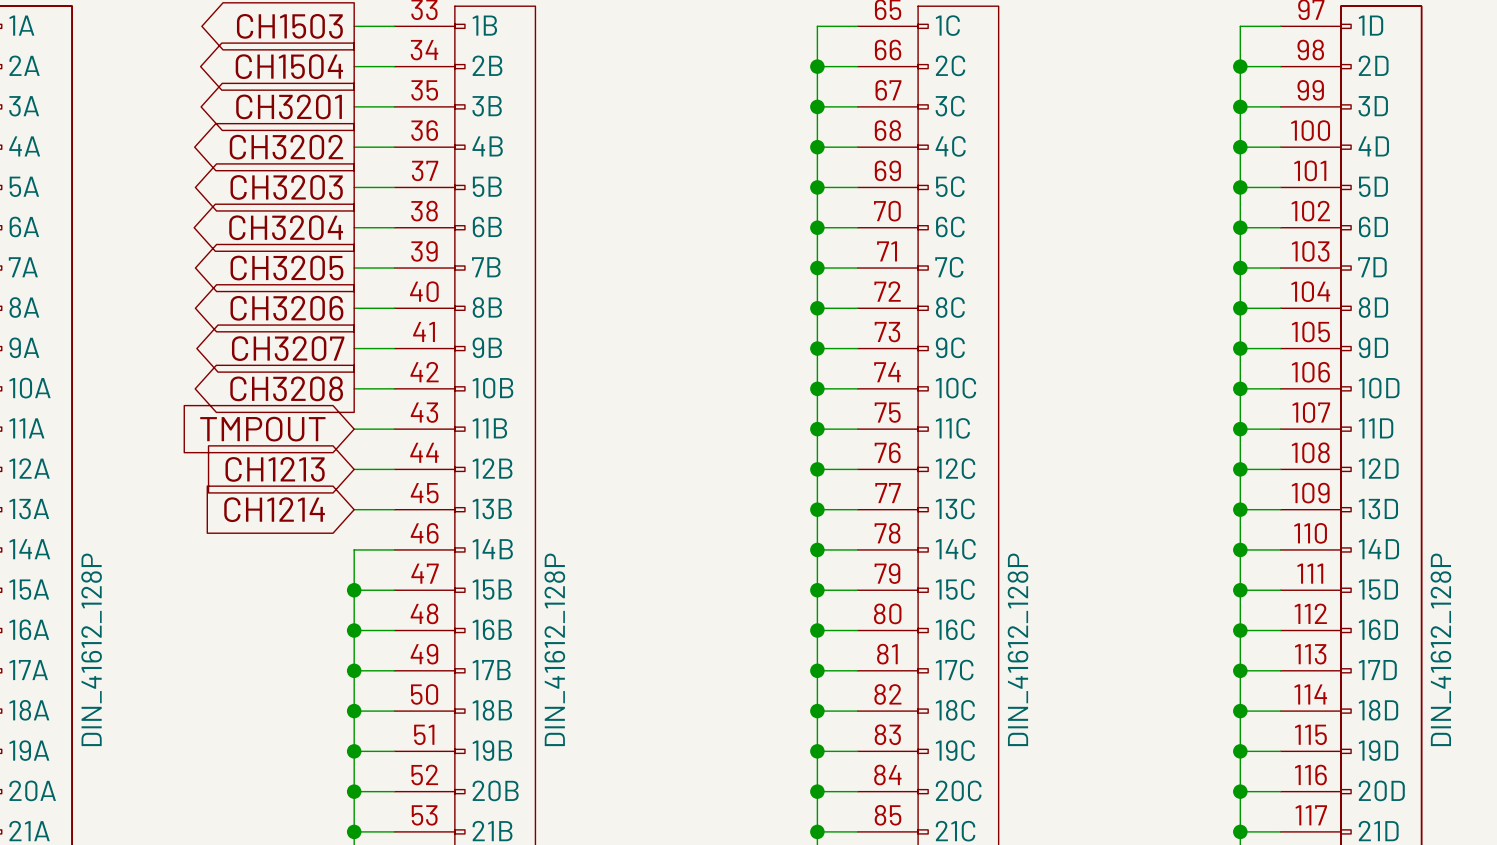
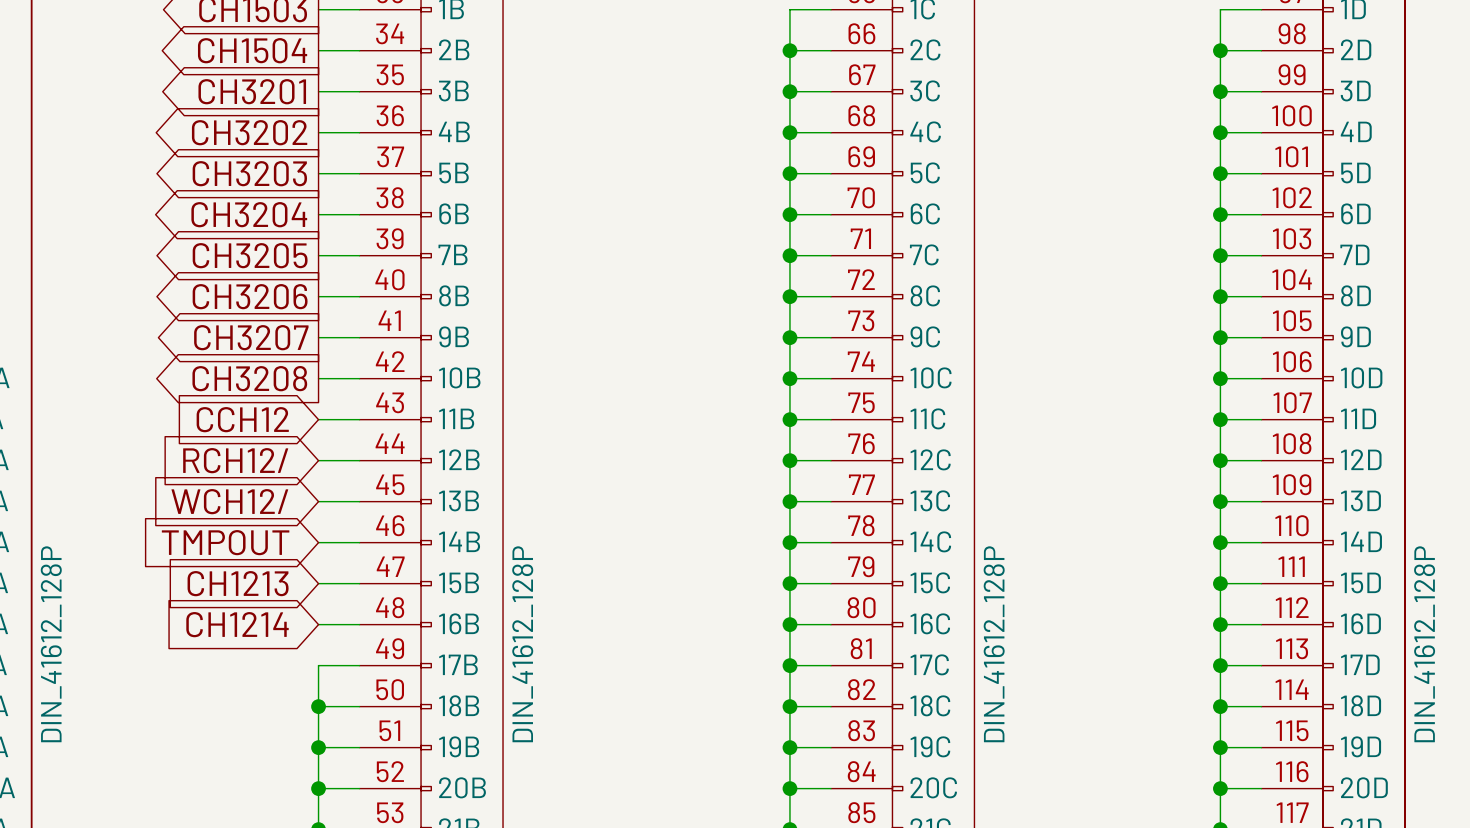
global label: TMPOUT (262, 429) -> CCH12 (242, 419)
global label: CH1213 (275, 469) -> RCH12/ (235, 460)
global label: CH1214 (274, 509) -> WCH12/ (229, 501)
global label: none -> TMPOUT (225, 542)
wire: (354, 549) (354, 670) -> none
global label: none -> CH1213 (238, 583)
junction: (354, 590) -> none
global label: none -> CH1214 (237, 624)
junction: (354, 630) -> none
junction: (354, 670) -> none

